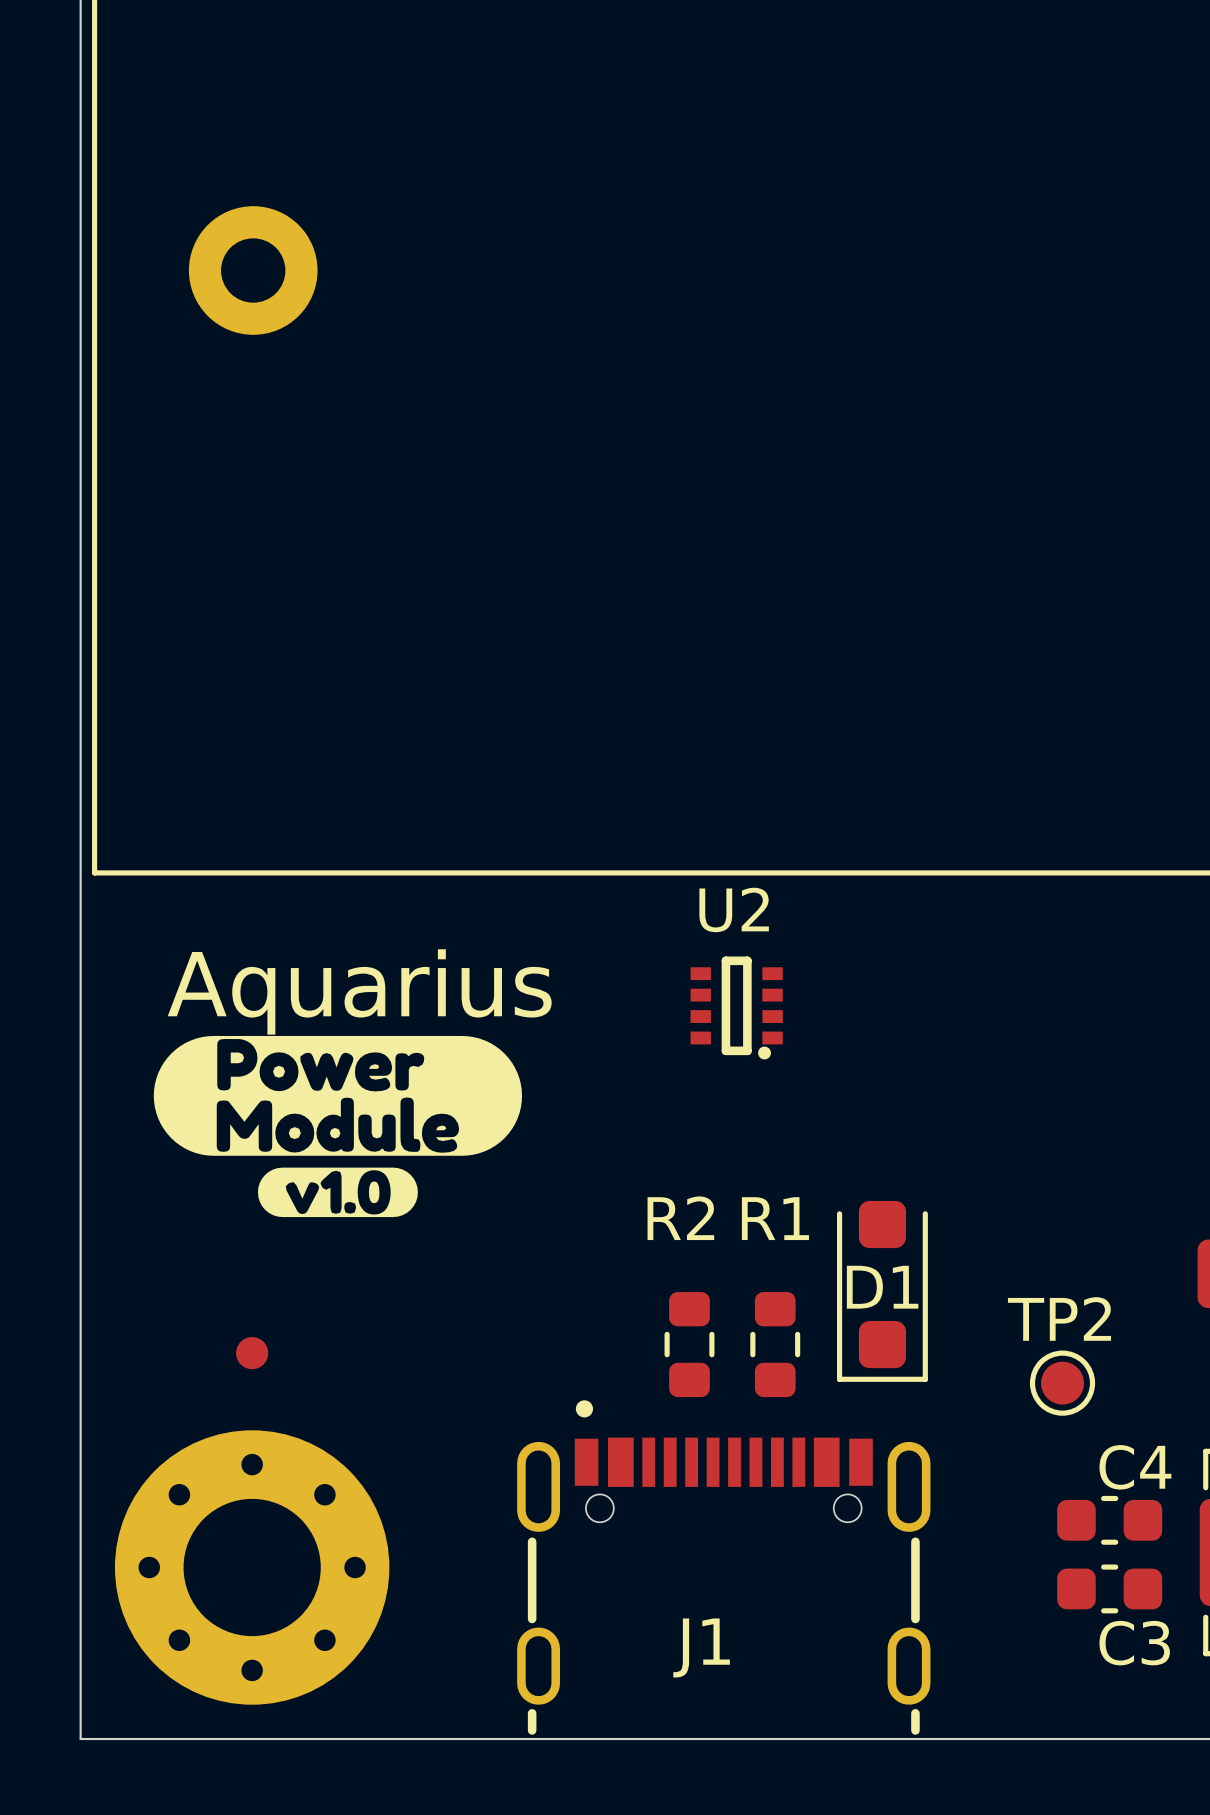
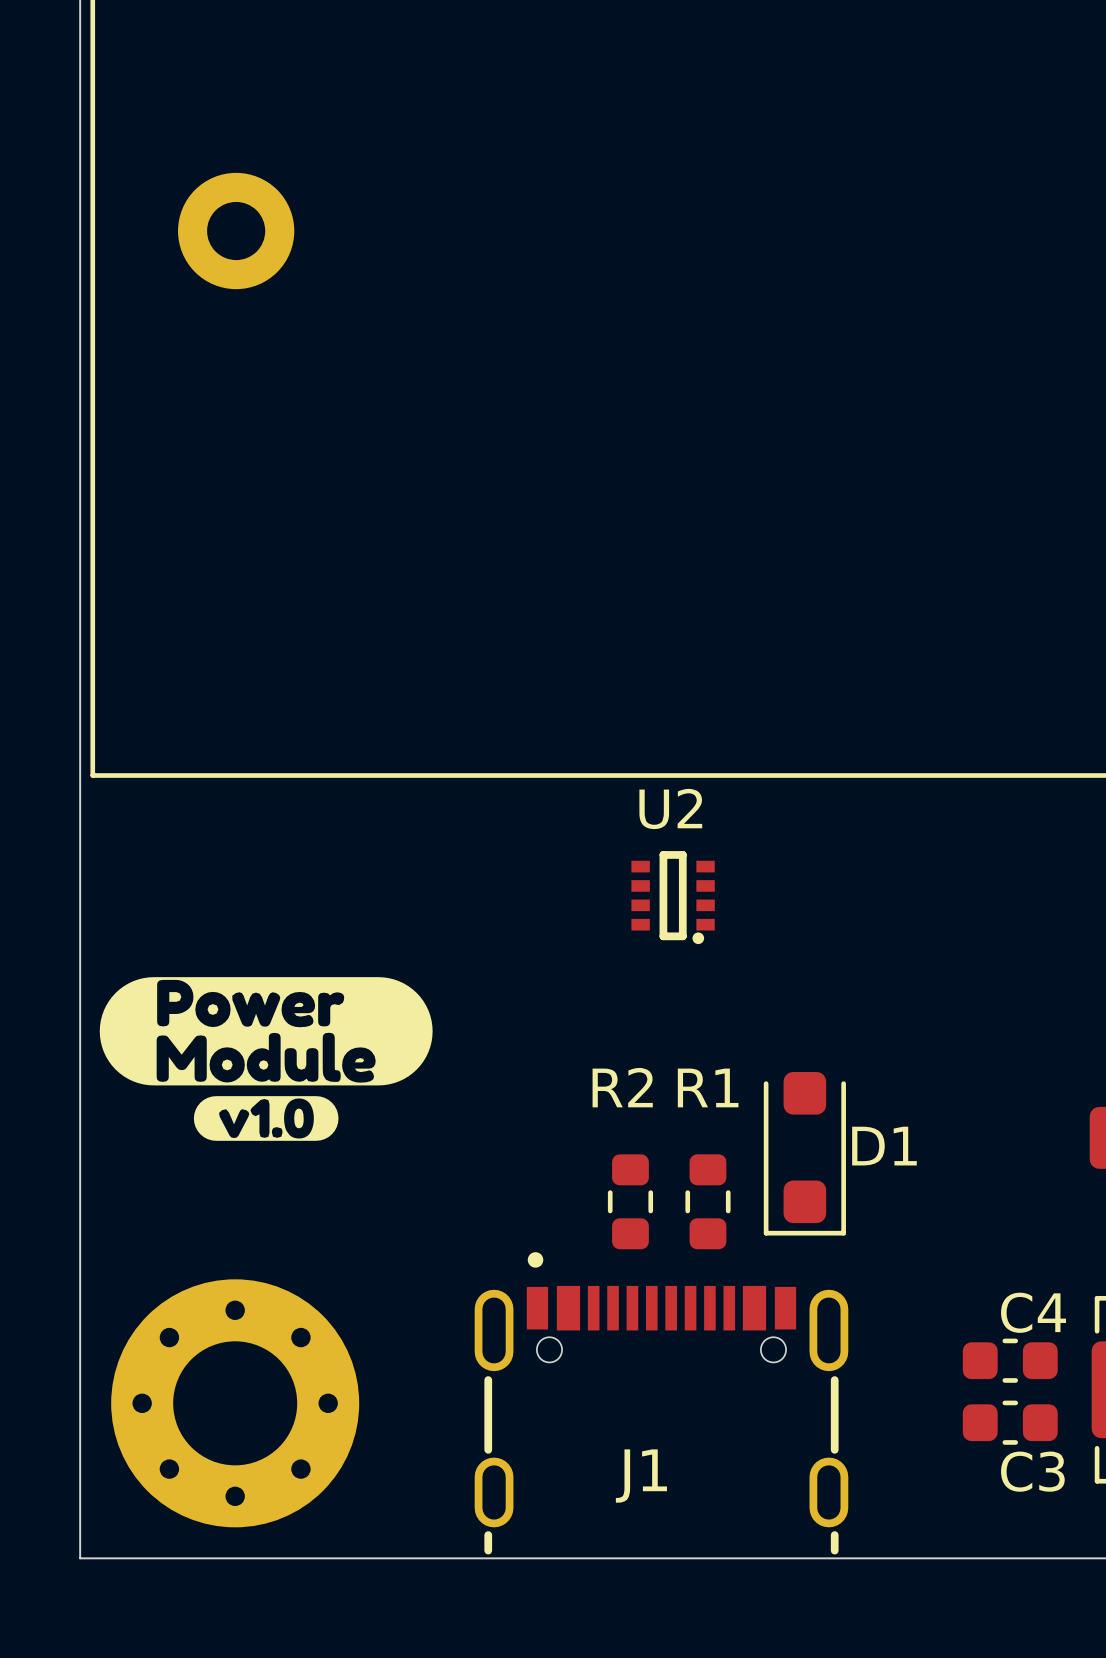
text: Aquarius (359, 991) -> none
drawing position: (337, 1095) -> (266, 1031)
drawing position: (337, 1192) -> (266, 1118)
D1 name position: D1 (882, 1287) -> D1 (884, 1146)
part: (252, 1353) -> none
TP2: (1062, 1383) -> none

